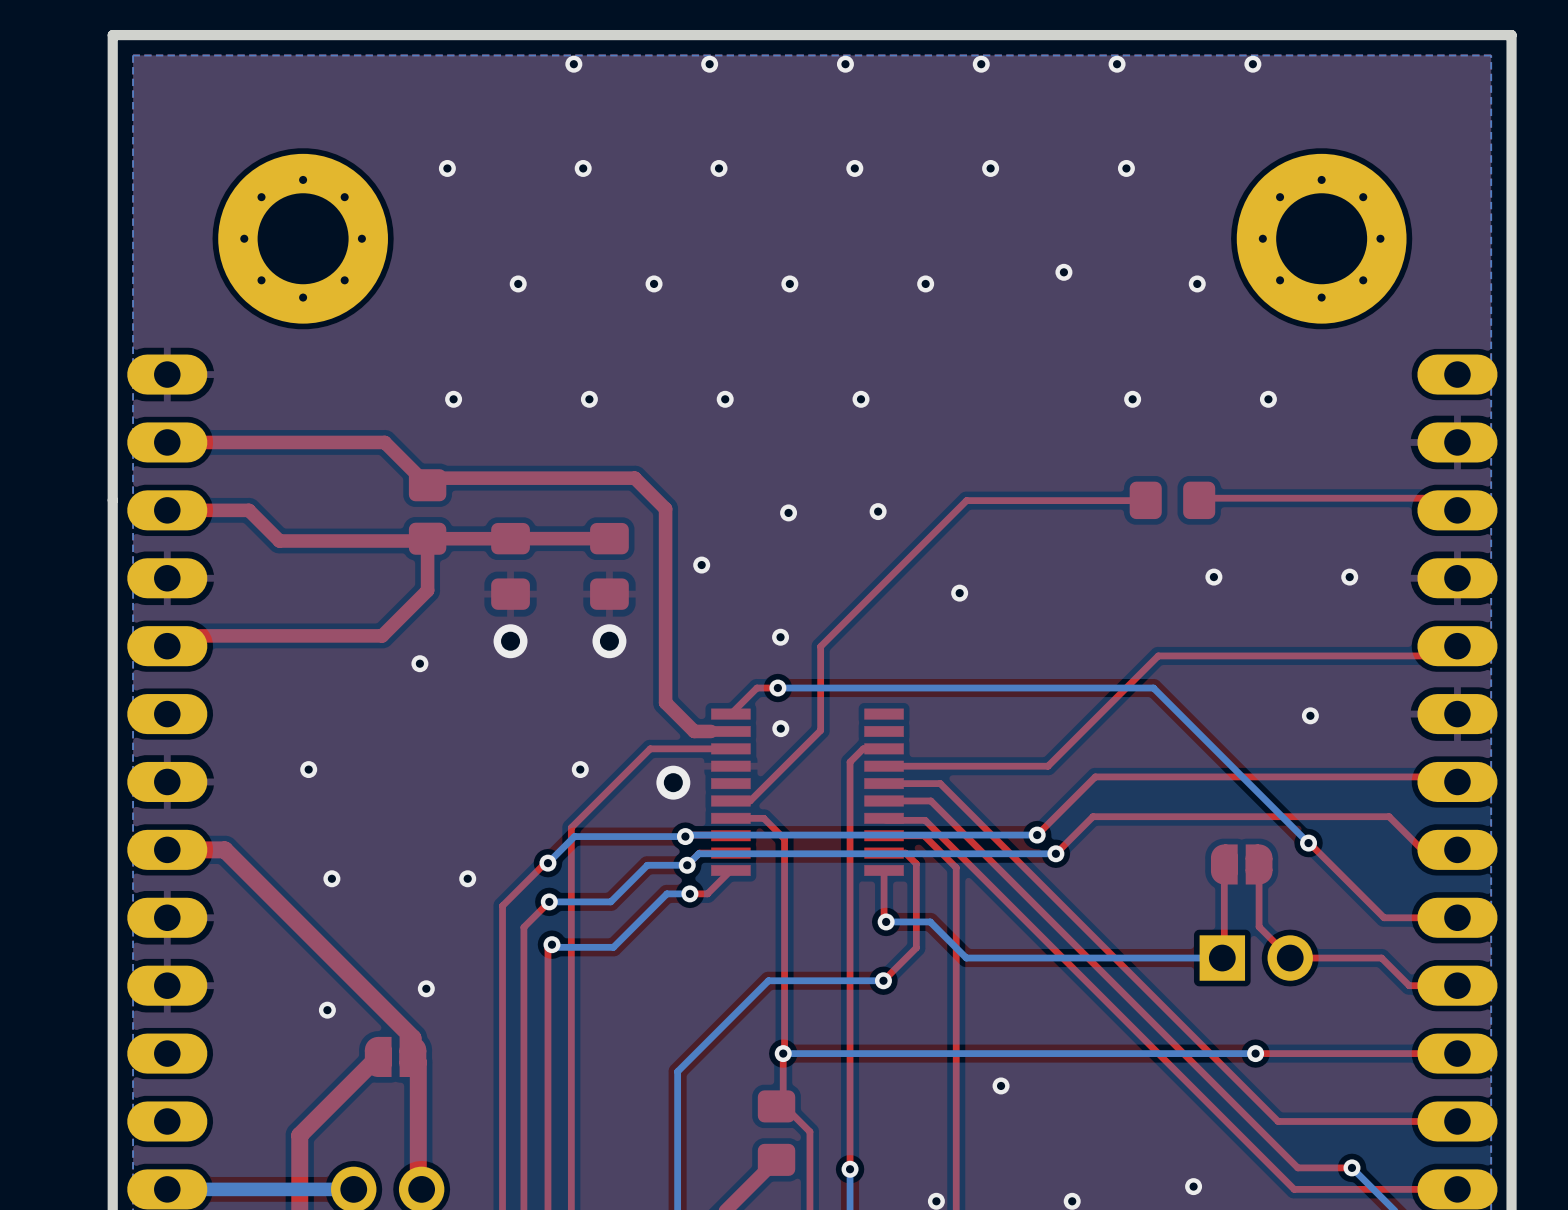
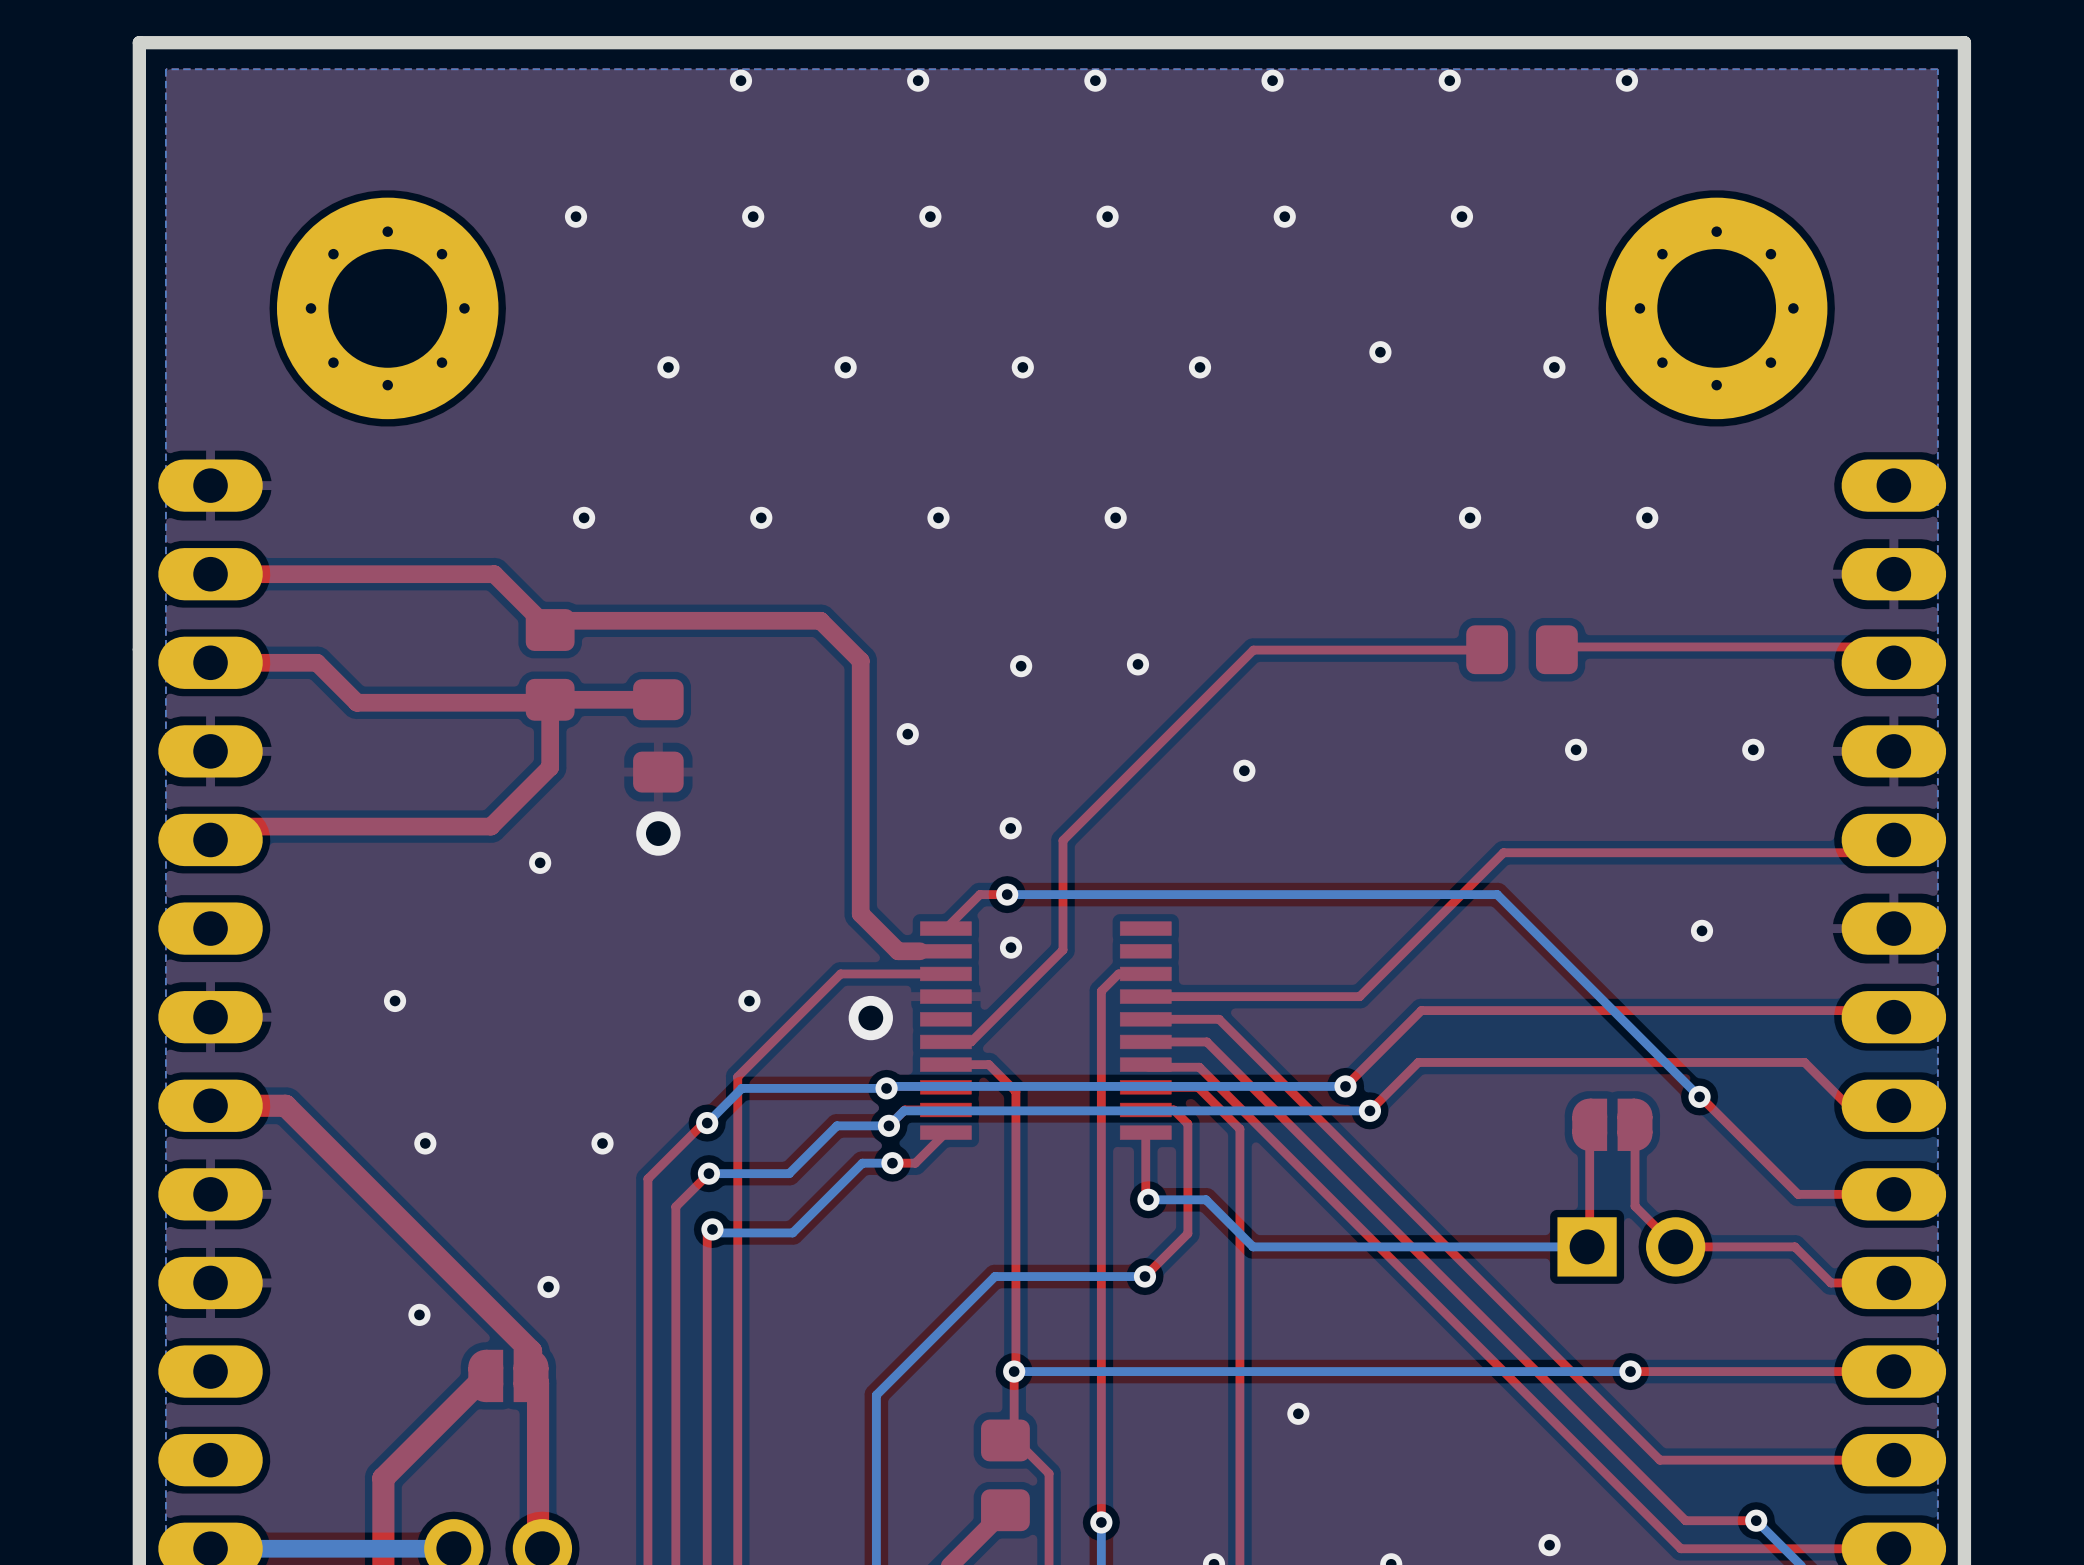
top track: (609, 538) (510, 538) -> none
part: (609, 566) -> none
via: (609, 641) -> none

